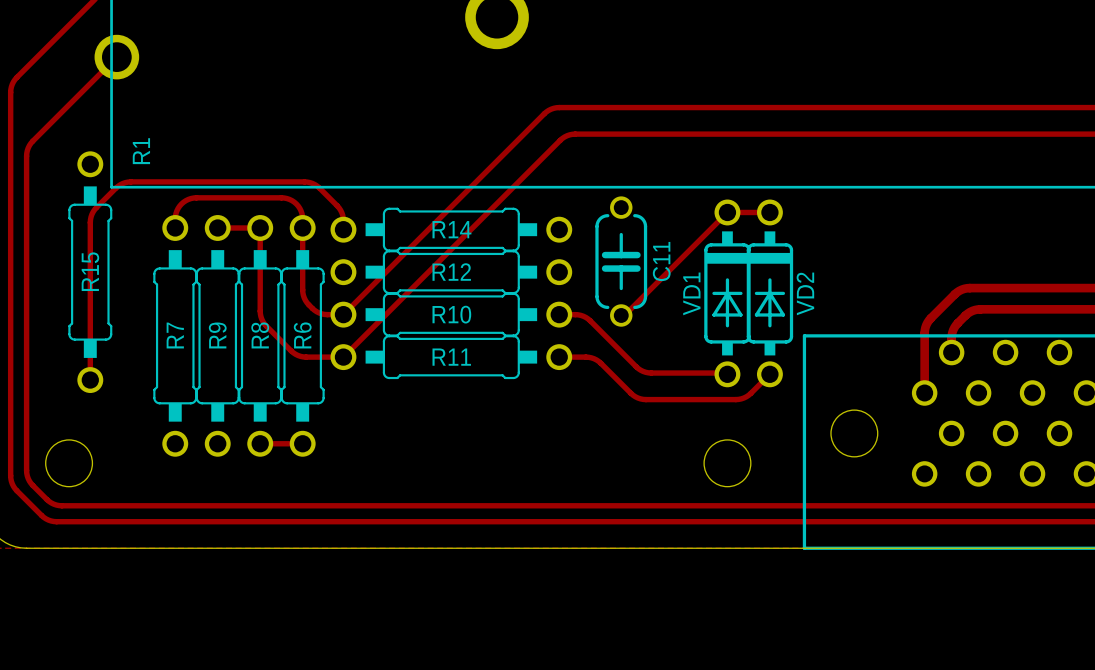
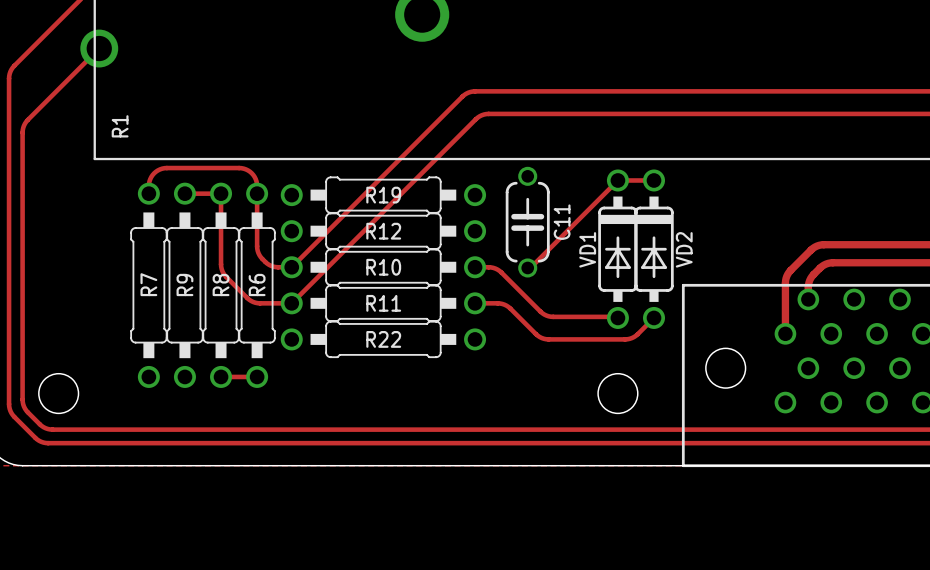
track: (343, 229) (342, 215) (339, 207) (317, 186) (310, 182) (130, 181) (120, 184) (94, 209) (90, 219) (90, 380) -> none
R14 name: R14 (451, 229) -> R19 (383, 195)
R15: (90, 272) -> none
R22: none -> (383, 339)

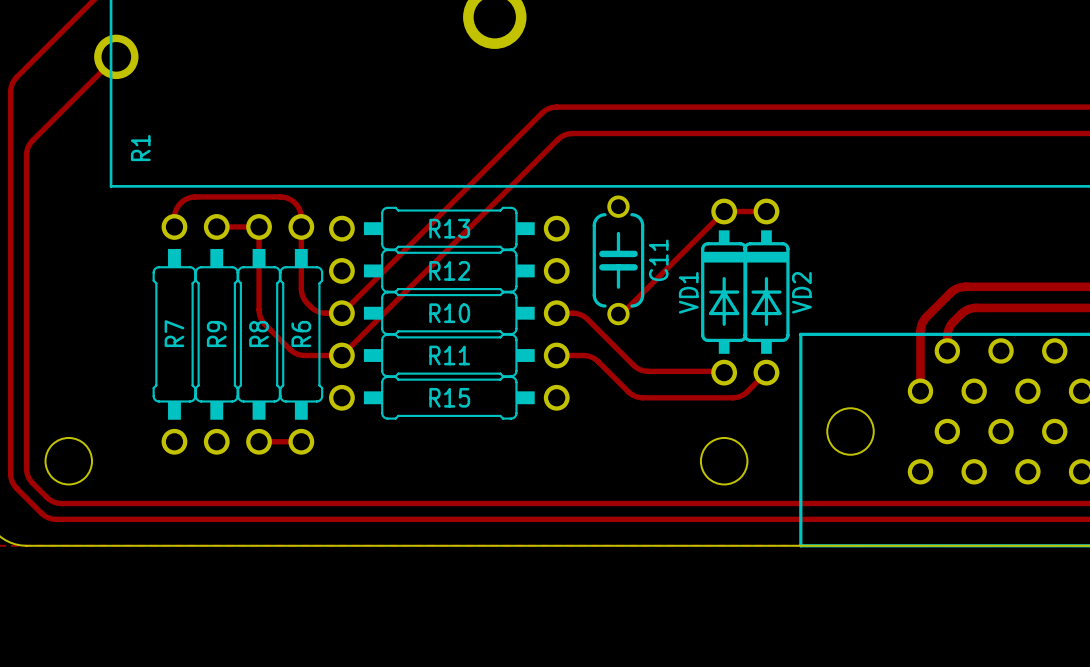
R19 name: R19 (383, 195) -> R13 (449, 228)
R22 name: R22 (383, 339) -> R15 (449, 397)

